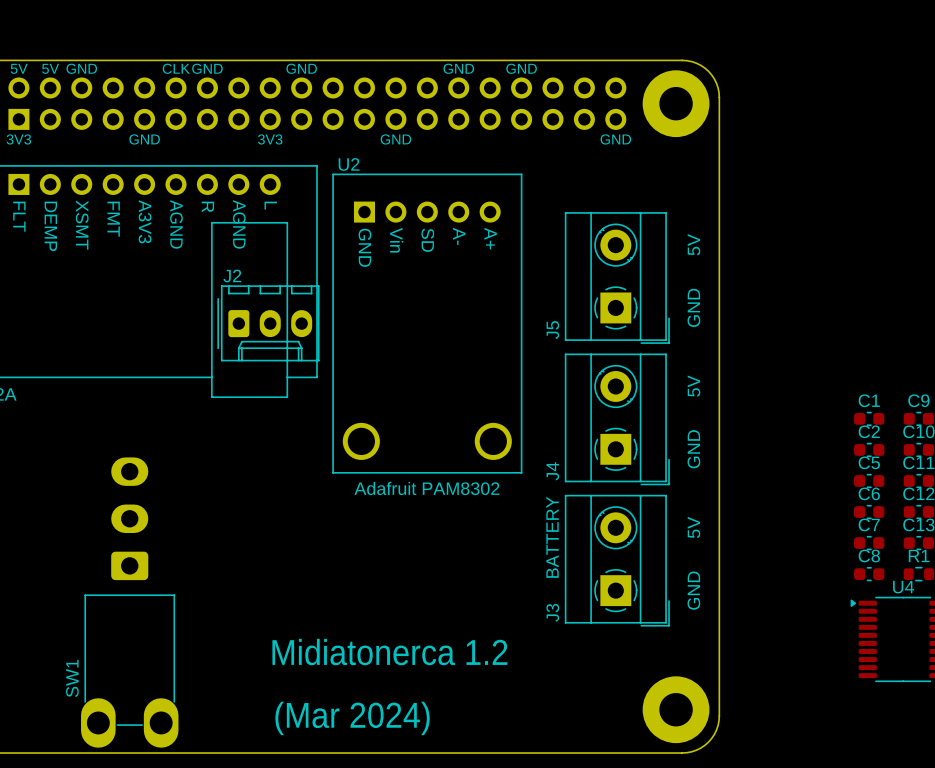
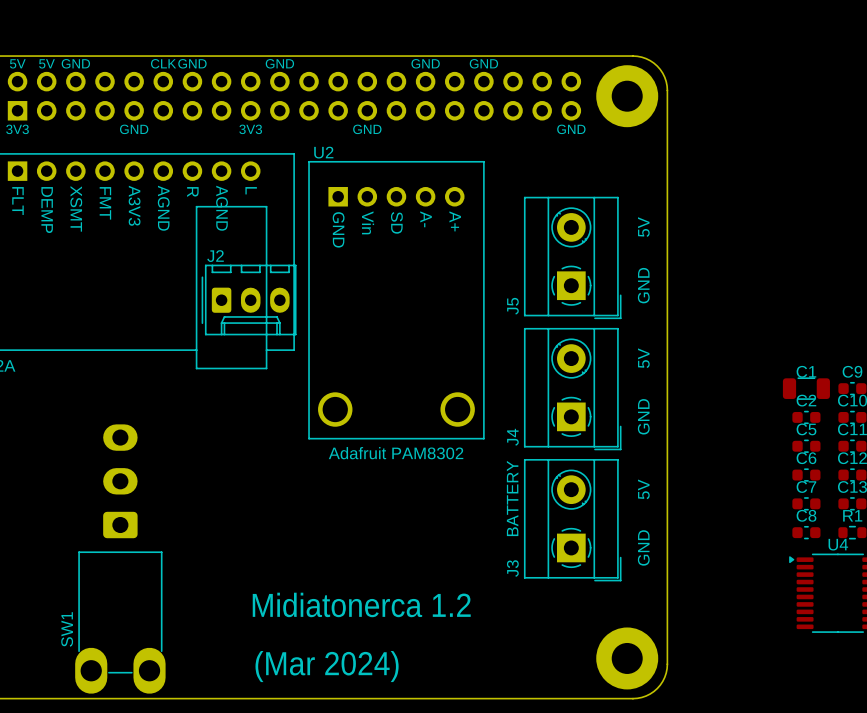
C1 footprint: [854, 411, 885, 426] -> [782, 377, 830, 400]

